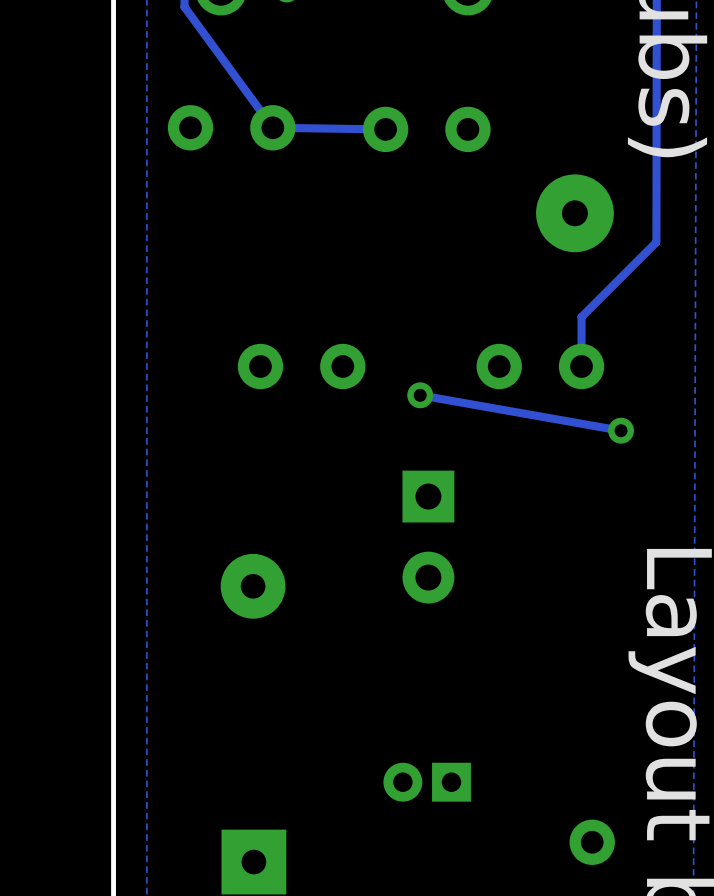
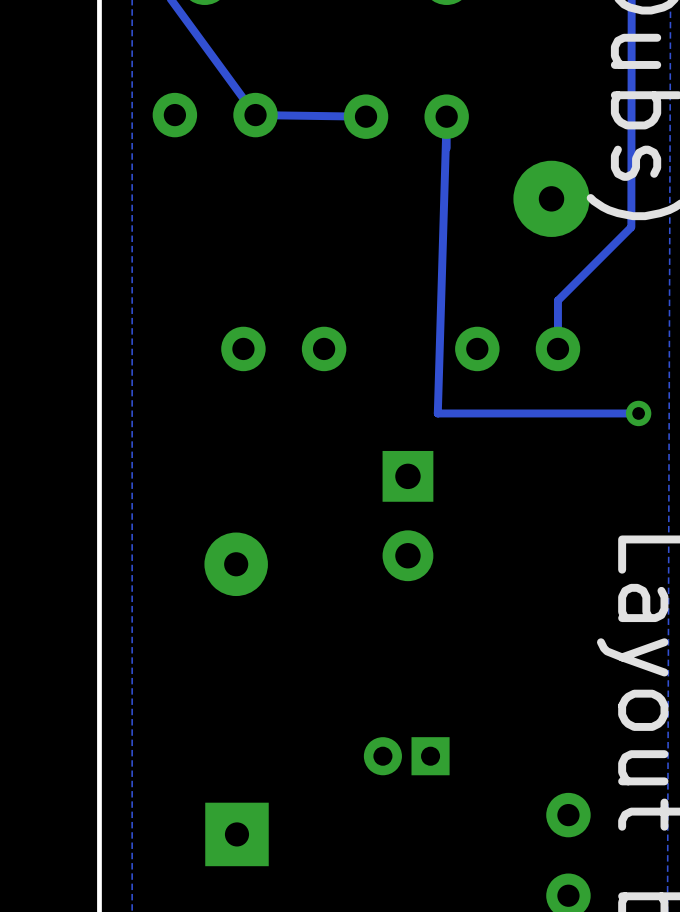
track: none -> (446, 148) (446, 116) (437, 413) (638, 413)
track: (420, 395) (621, 430) -> none
via: (420, 395) -> none
via position: (621, 430) -> (638, 413)

